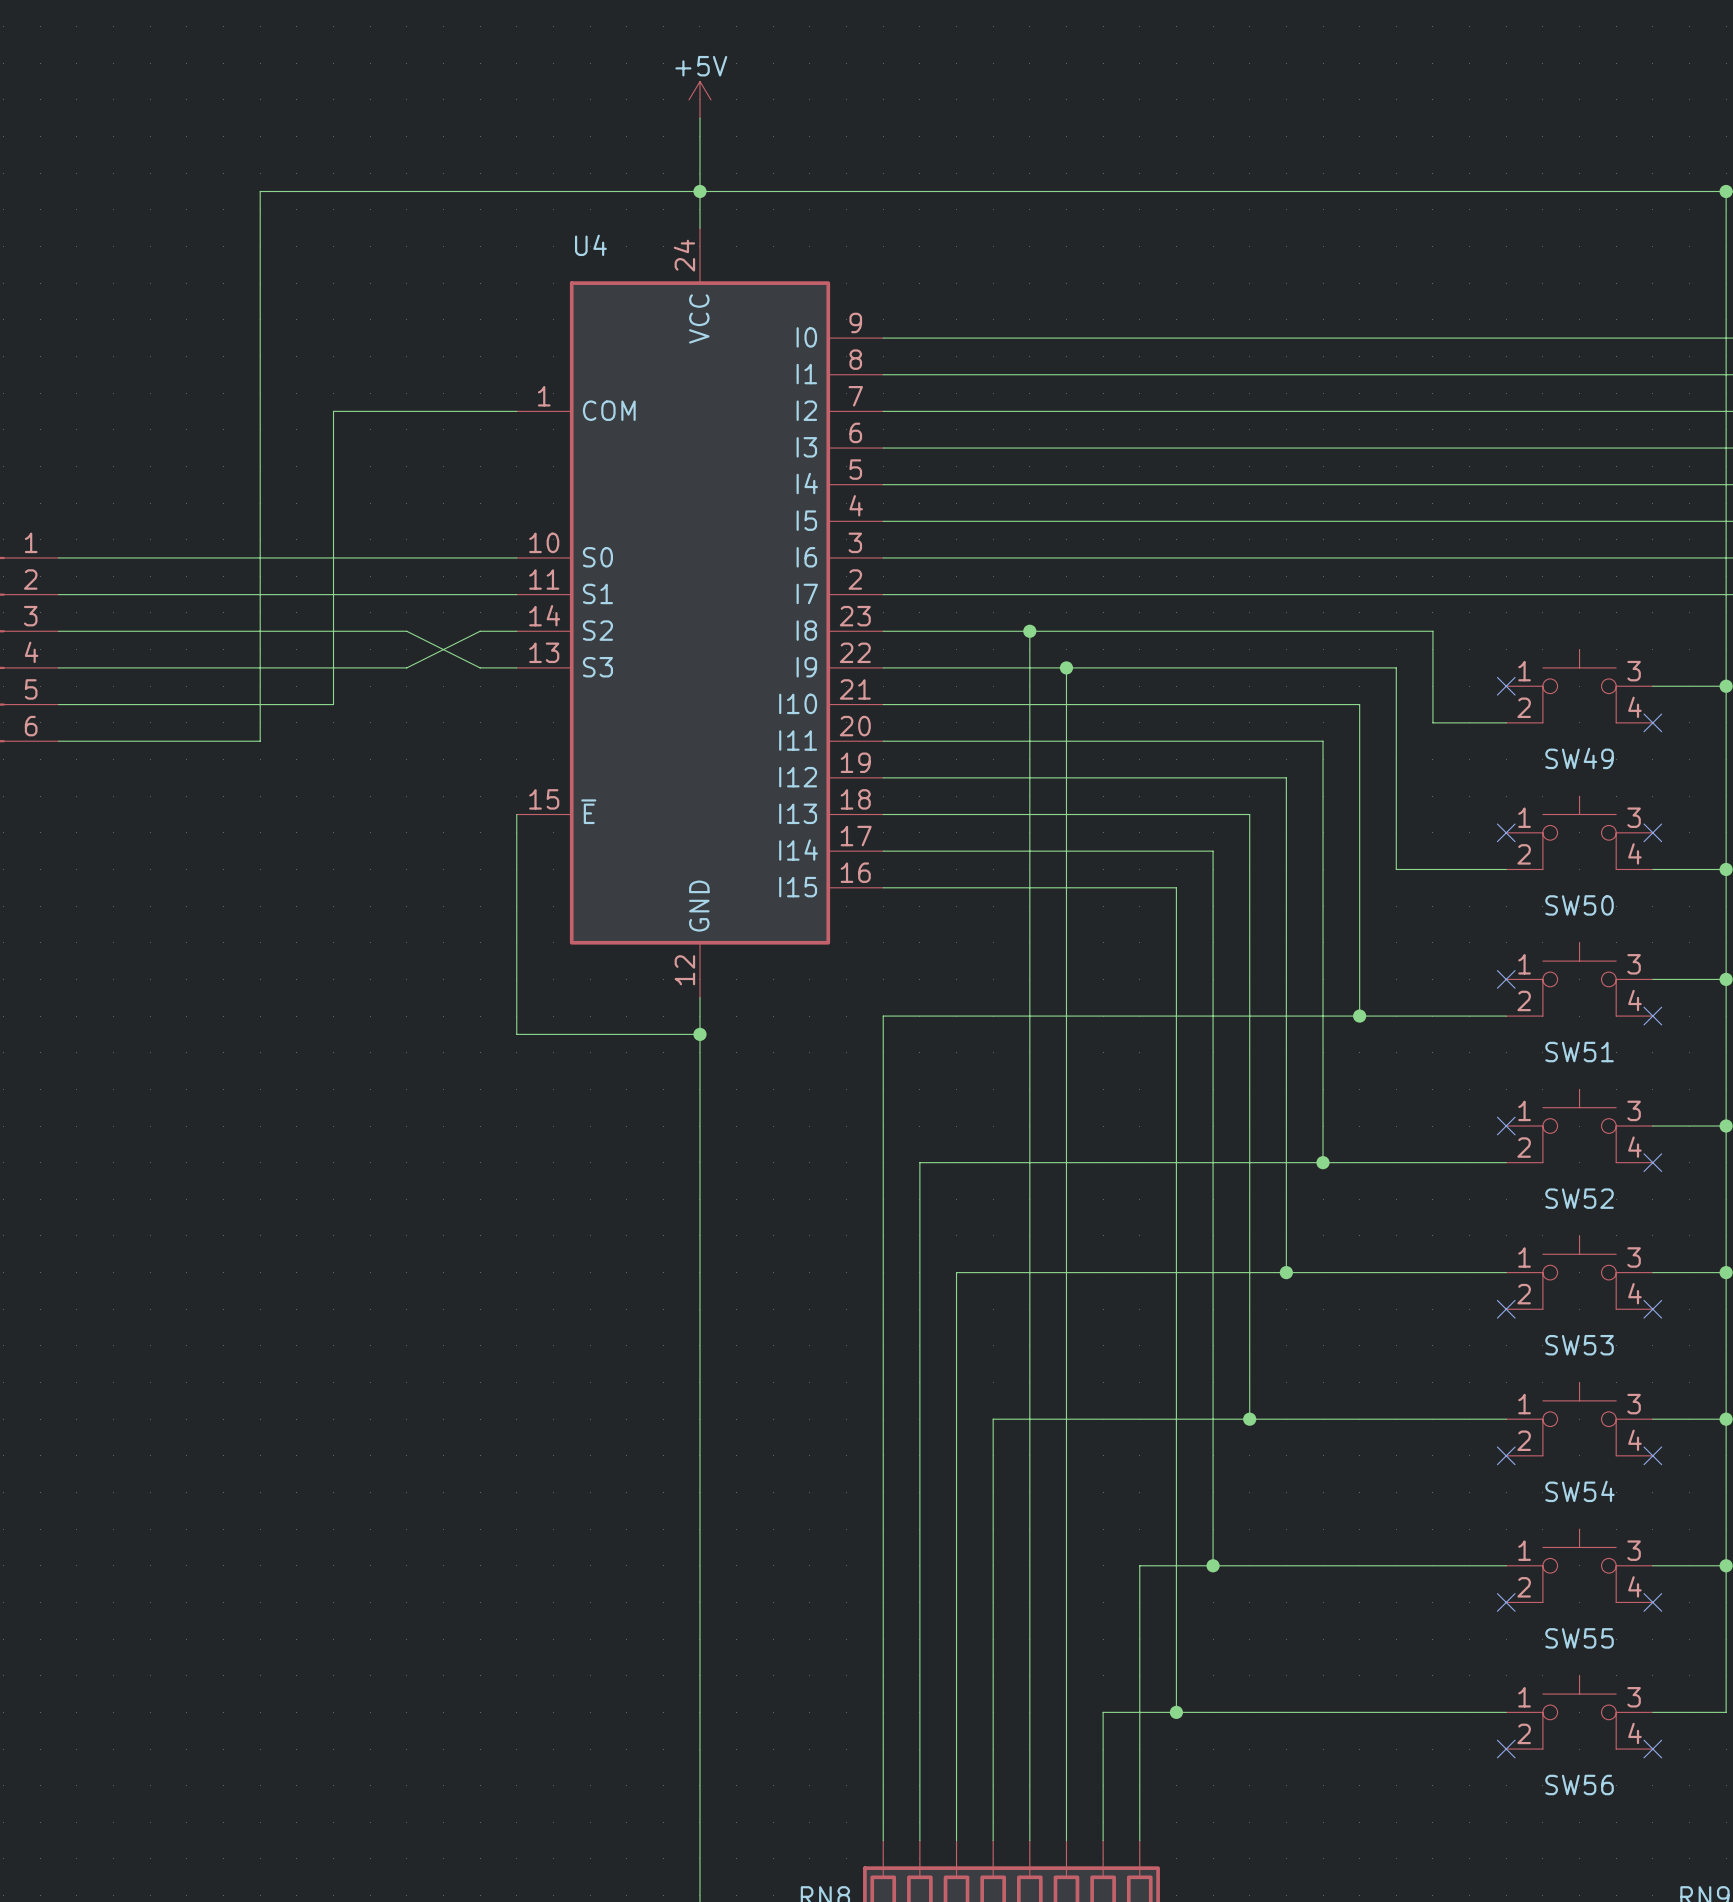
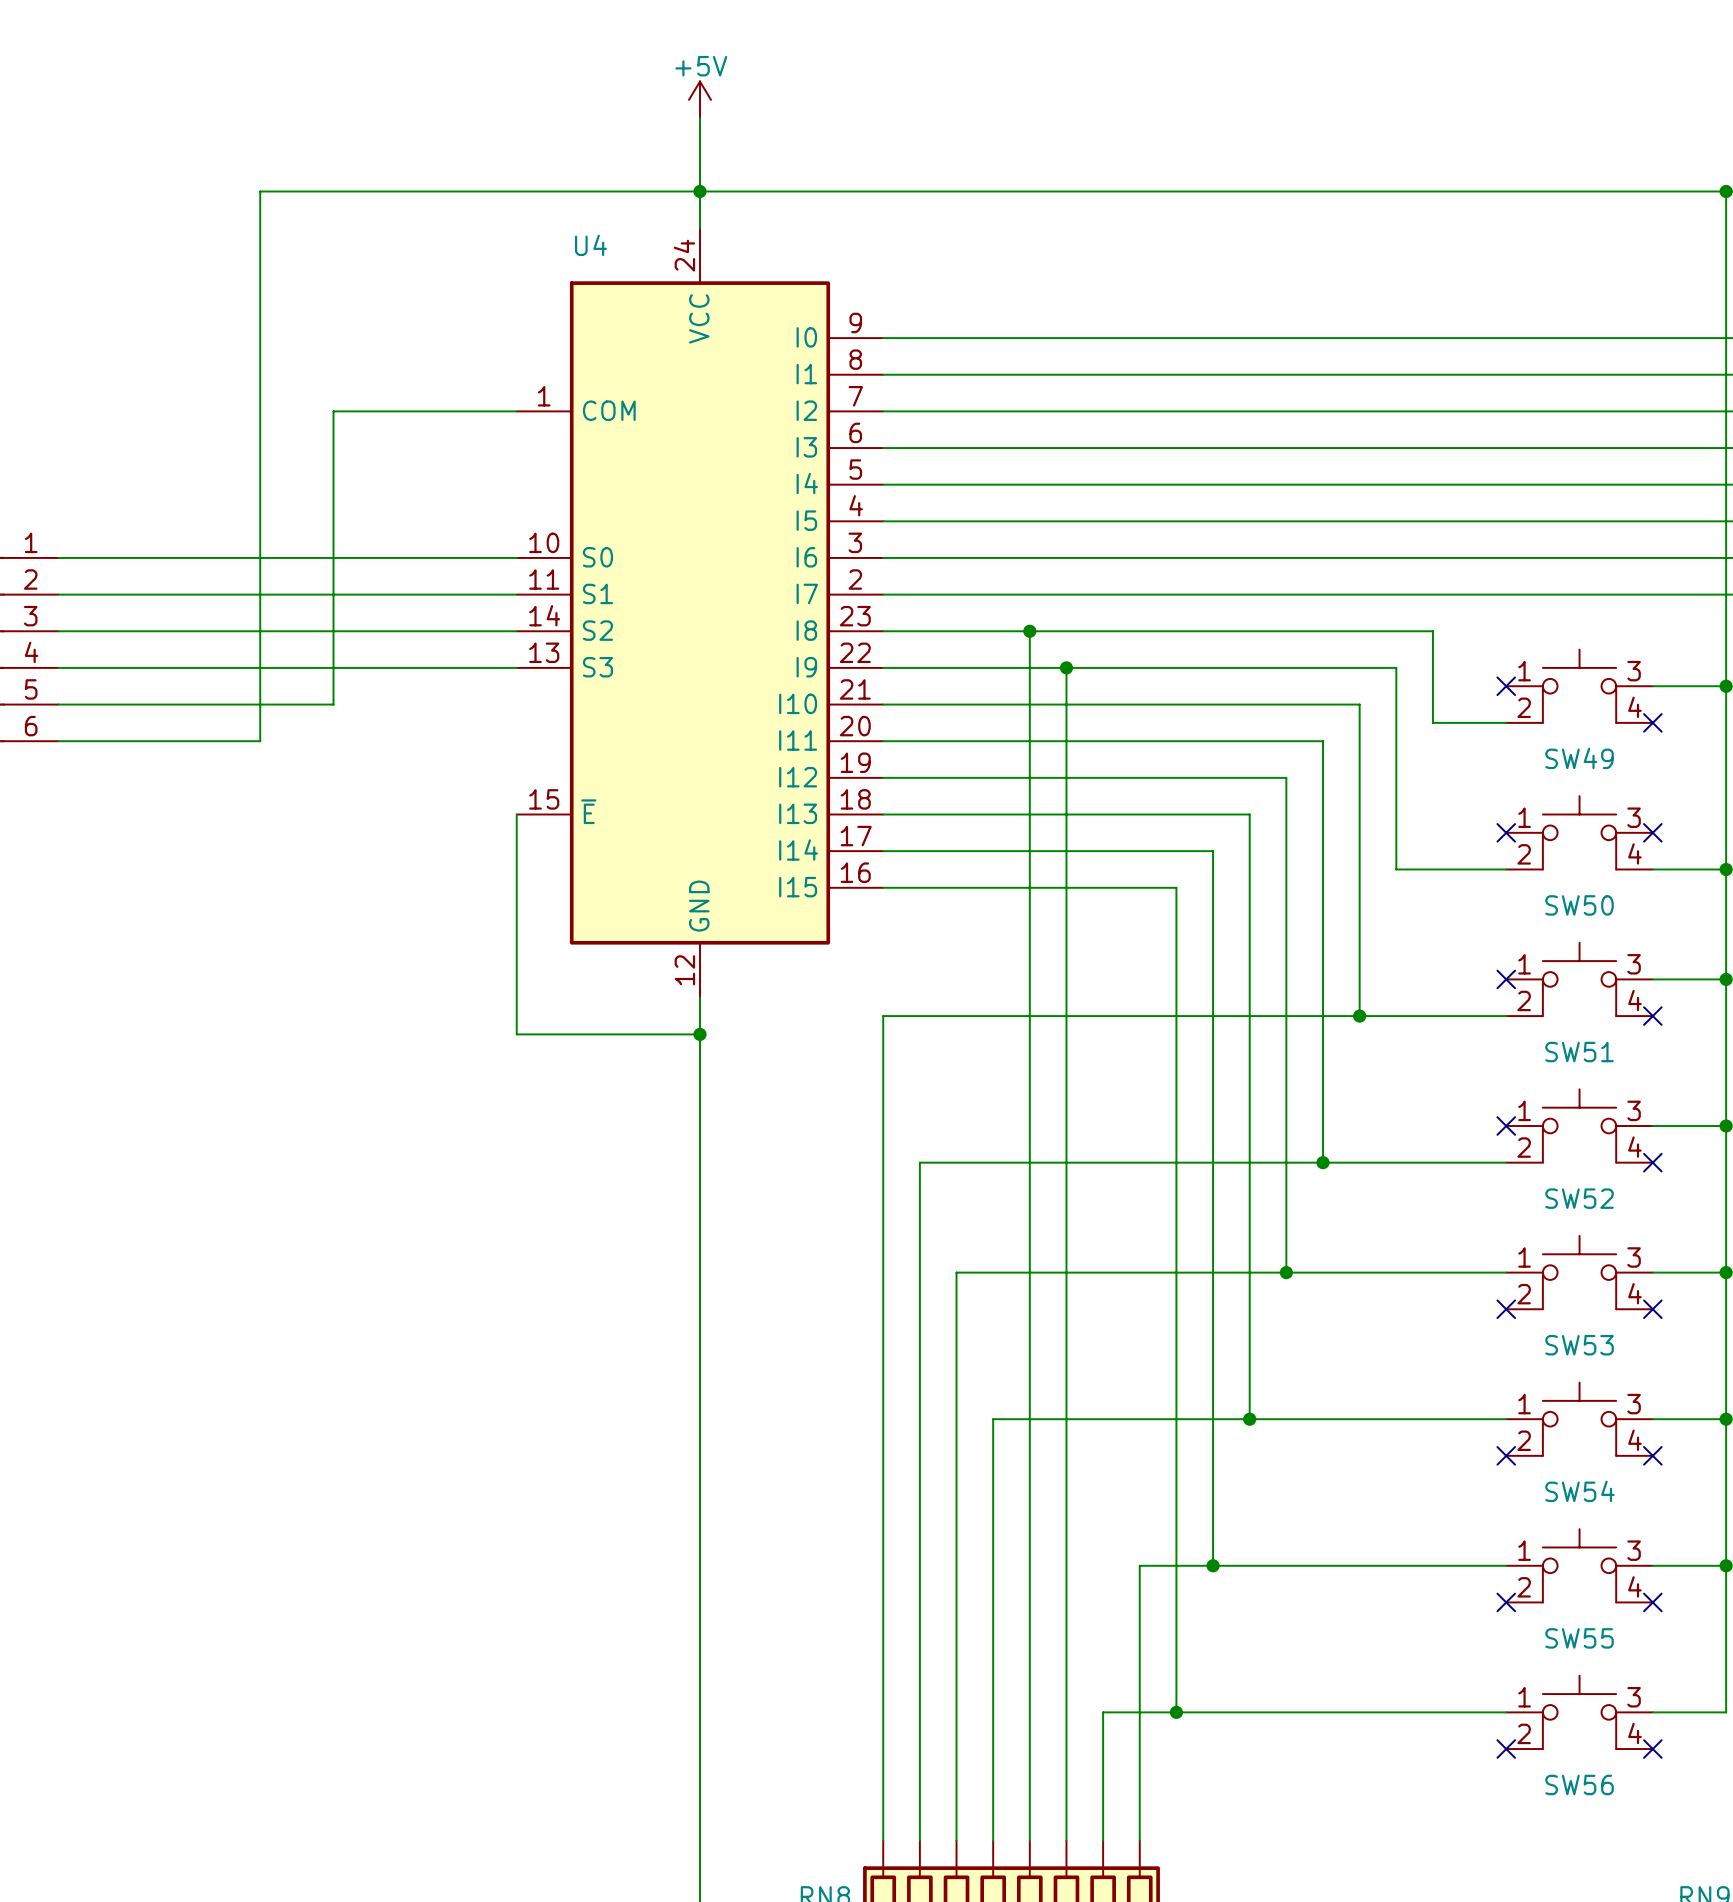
wire: (406, 631) (480, 667) -> (406, 631) (480, 631)
wire: (480, 631) (406, 667) -> (480, 667) (406, 667)

